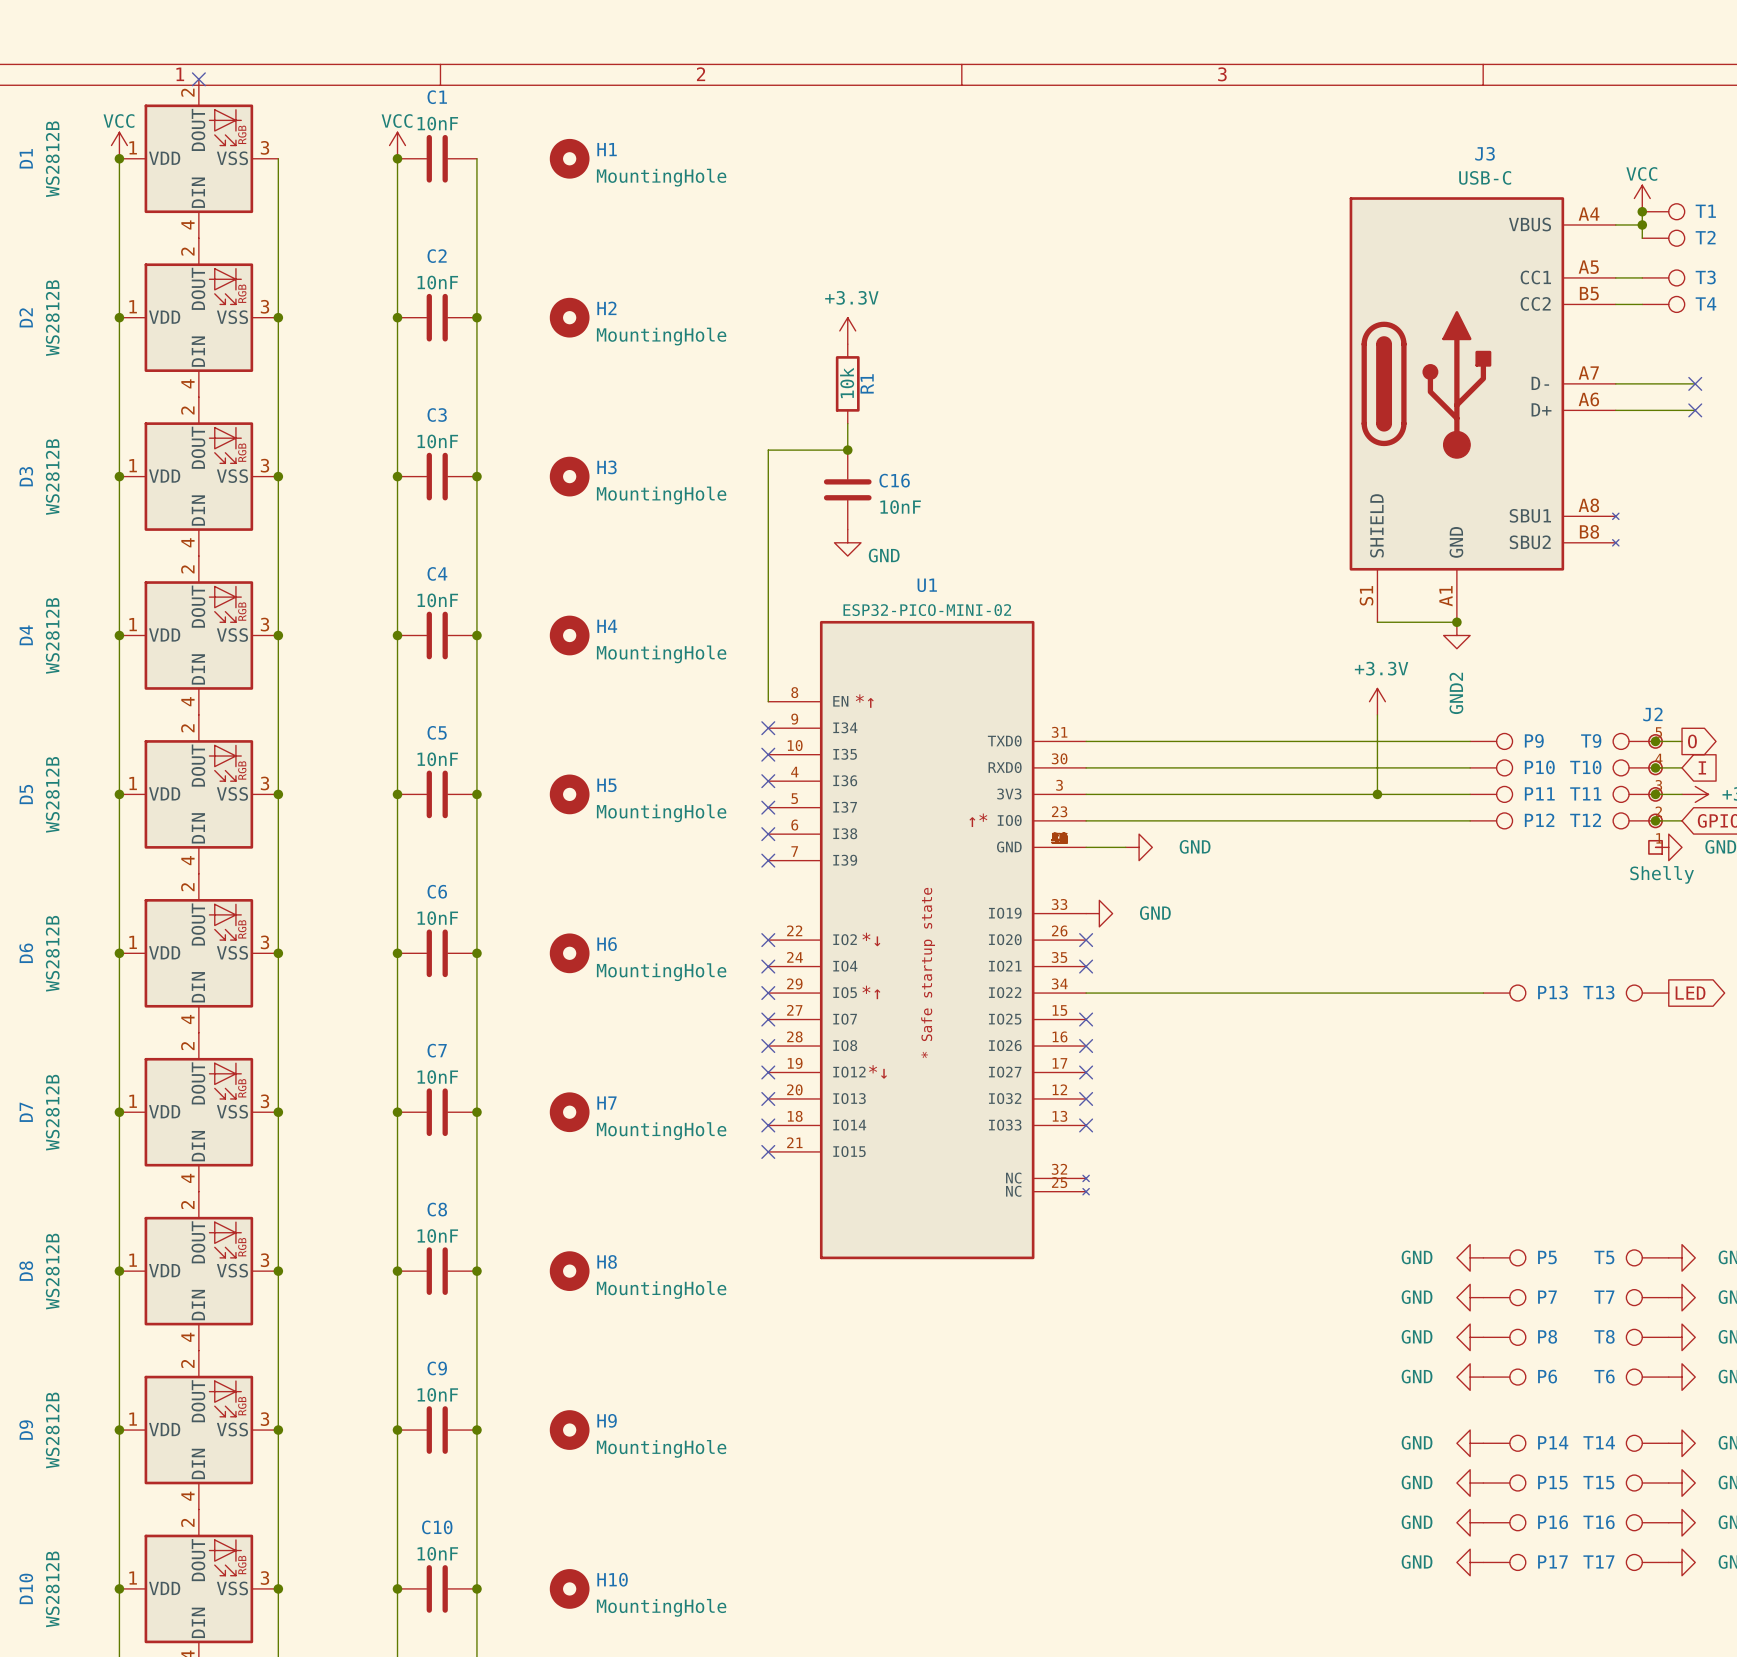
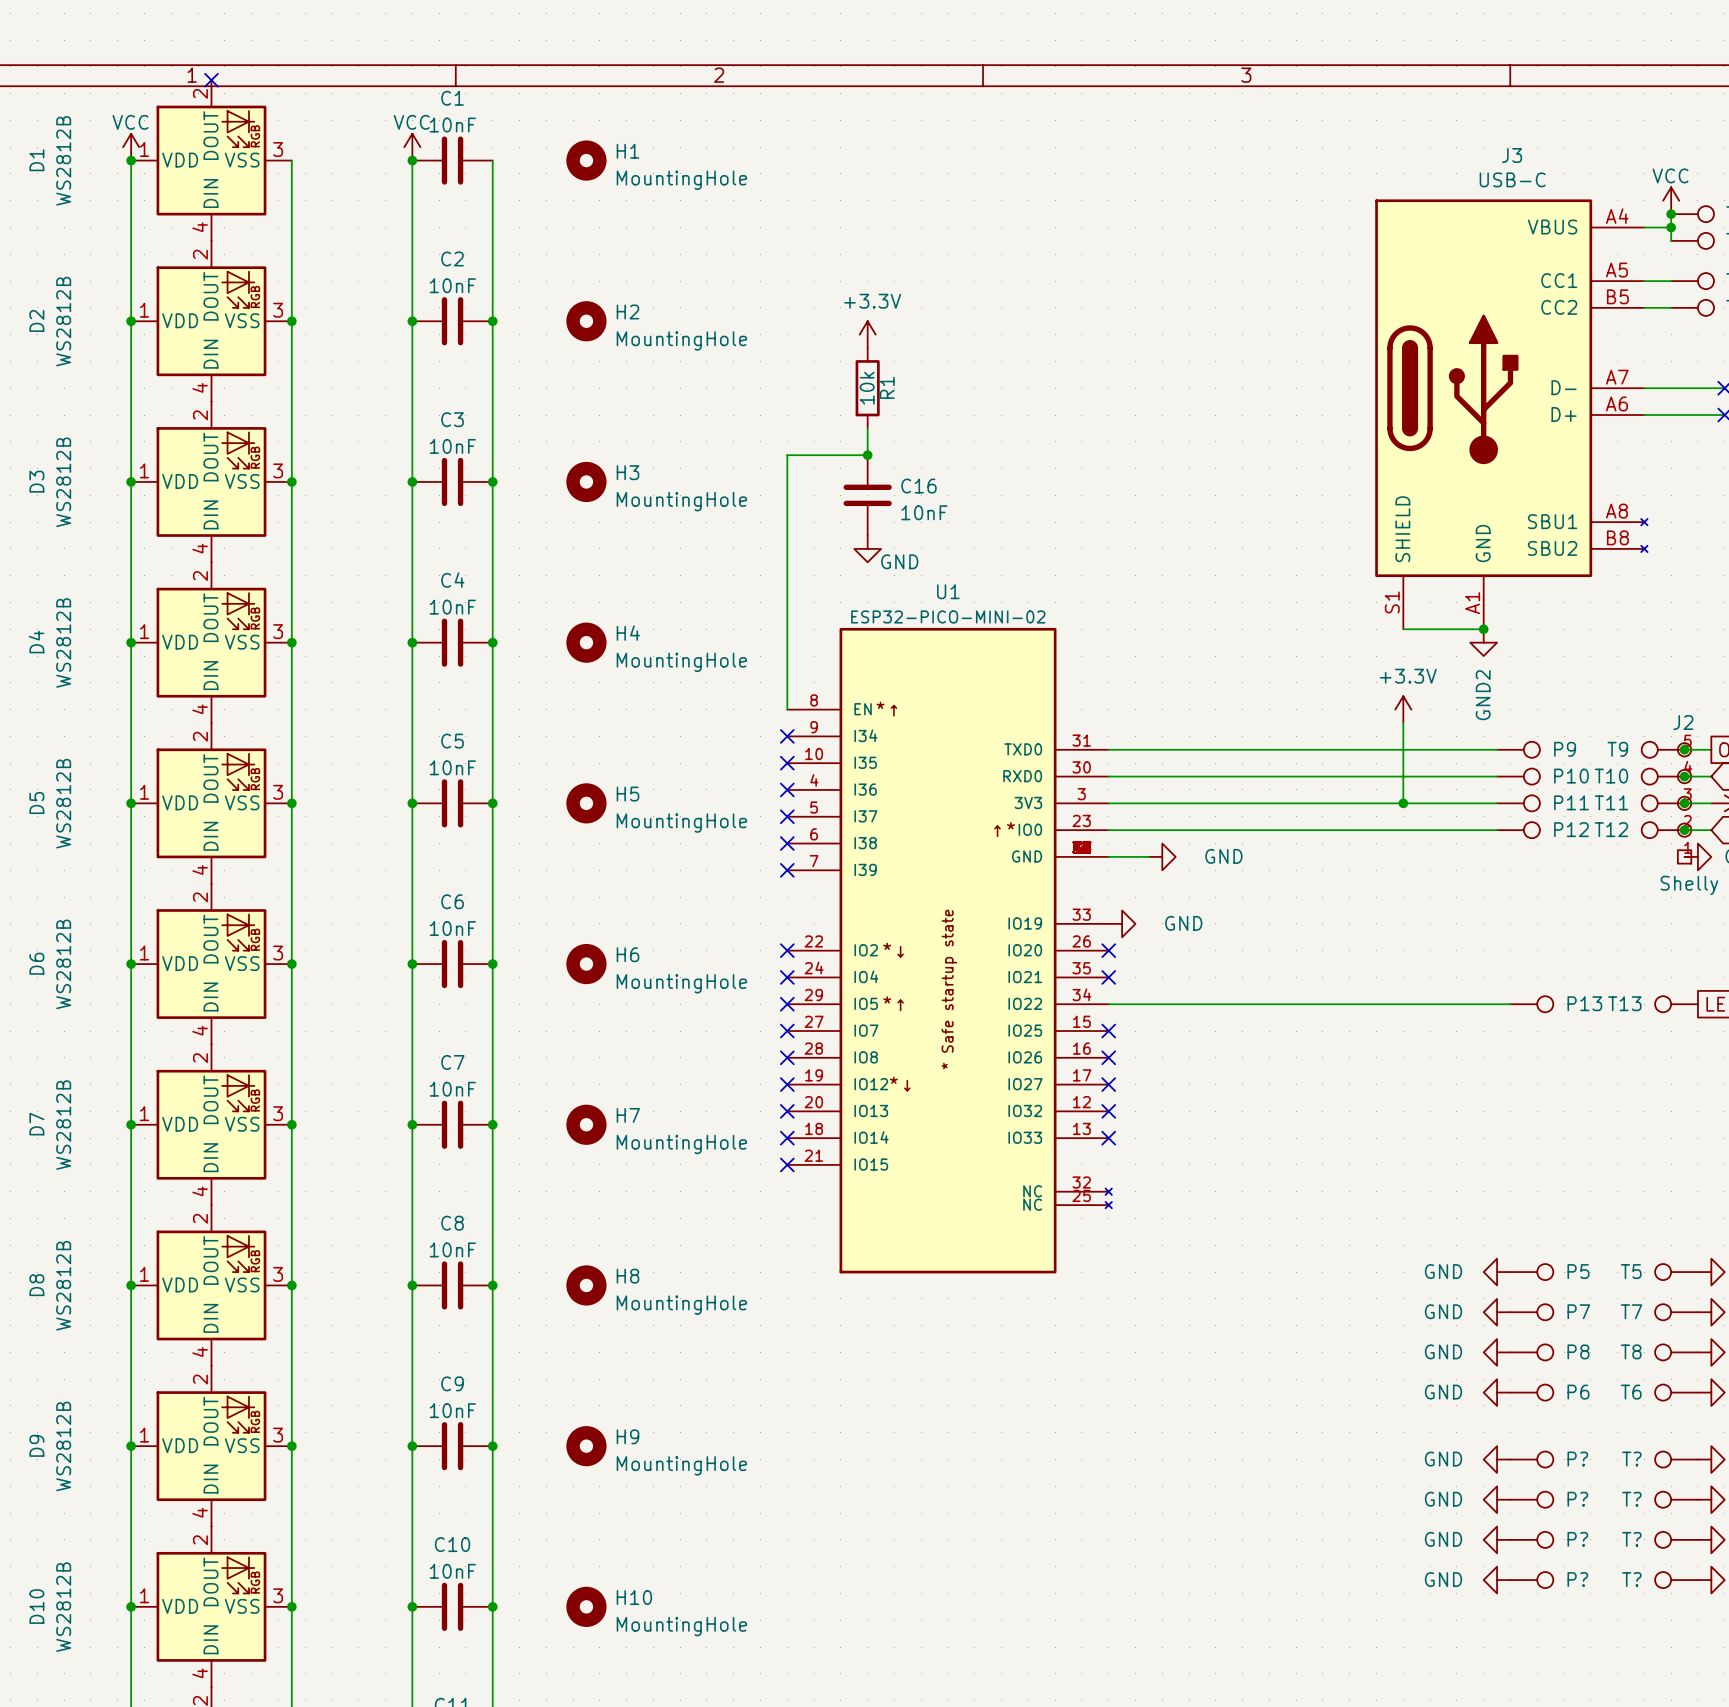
P14 name: P14 (1553, 1442) -> P? (1577, 1459)
T14 name: T14 (1599, 1442) -> T? (1631, 1459)
P15 name: P15 (1552, 1482) -> P? (1577, 1499)
T15 name: T15 (1598, 1482) -> T? (1631, 1499)
P16 name: P16 (1553, 1522) -> P? (1577, 1539)
T16 name: T16 (1599, 1522) -> T? (1631, 1539)
P17 name: P17 (1552, 1561) -> P? (1577, 1579)
T17 name: T17 (1598, 1561) -> T? (1631, 1579)

